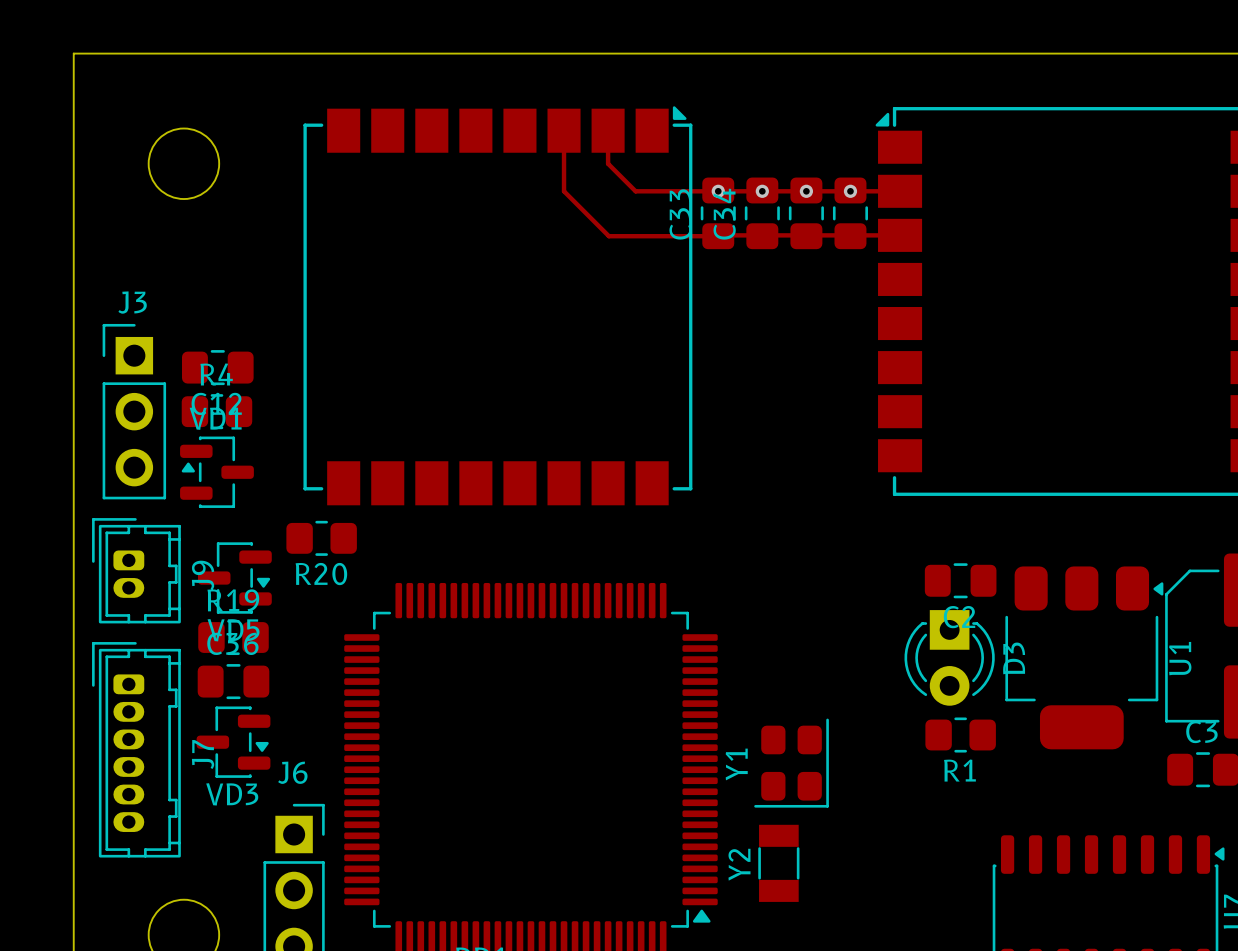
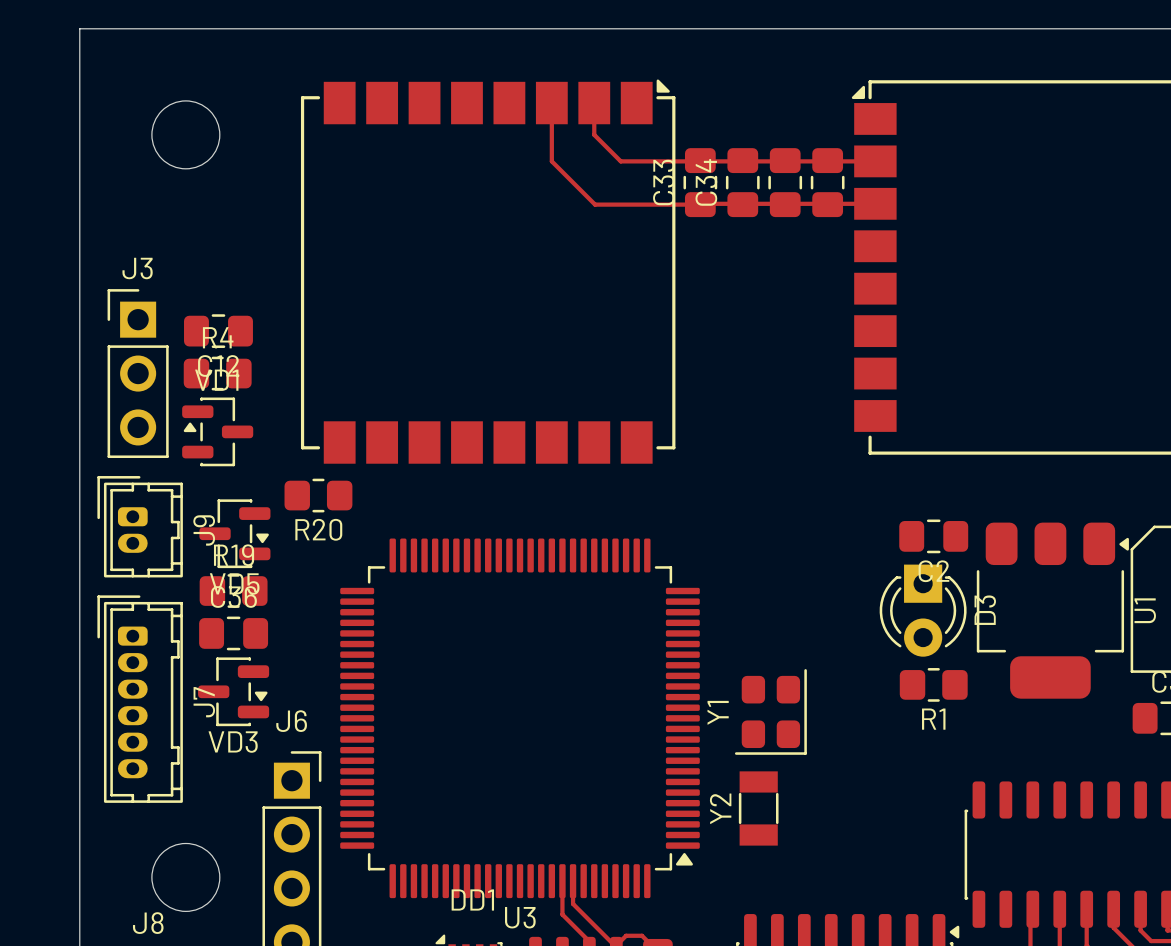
via: (718, 191) -> none
via: (762, 191) -> none
via: (806, 191) -> none
via: (850, 191) -> none

